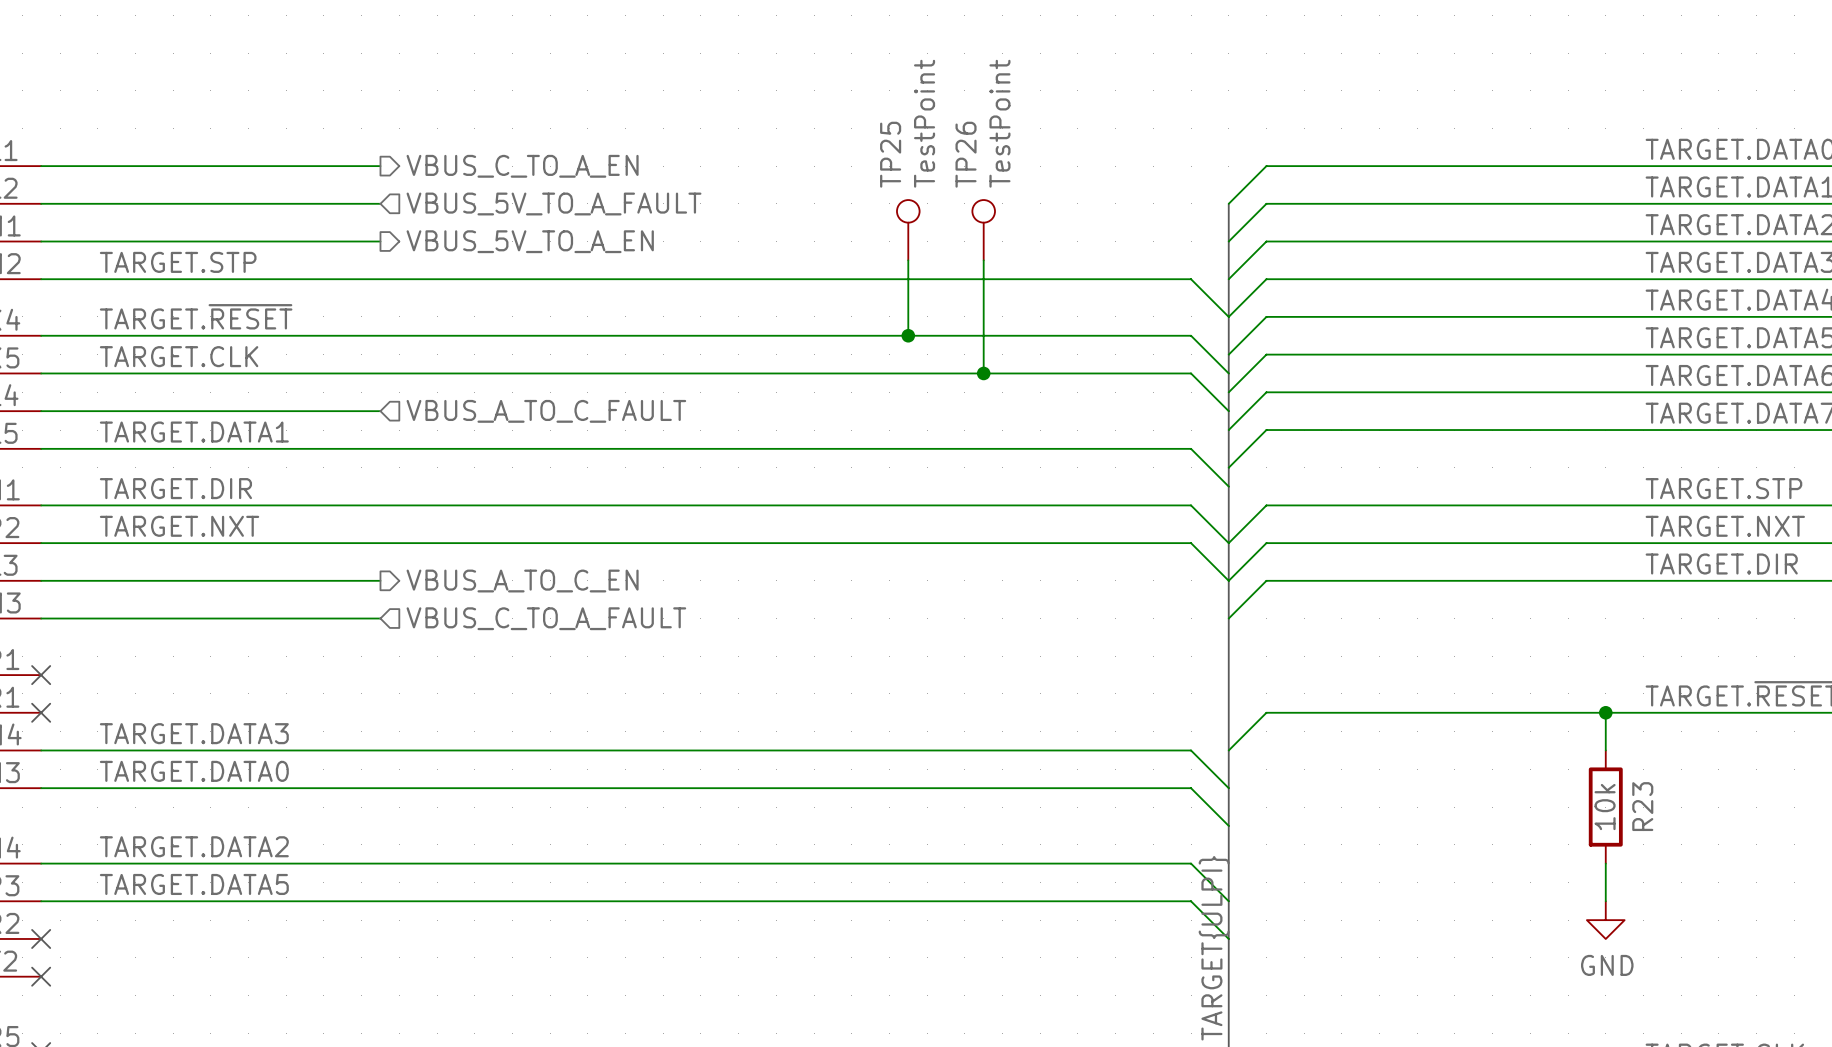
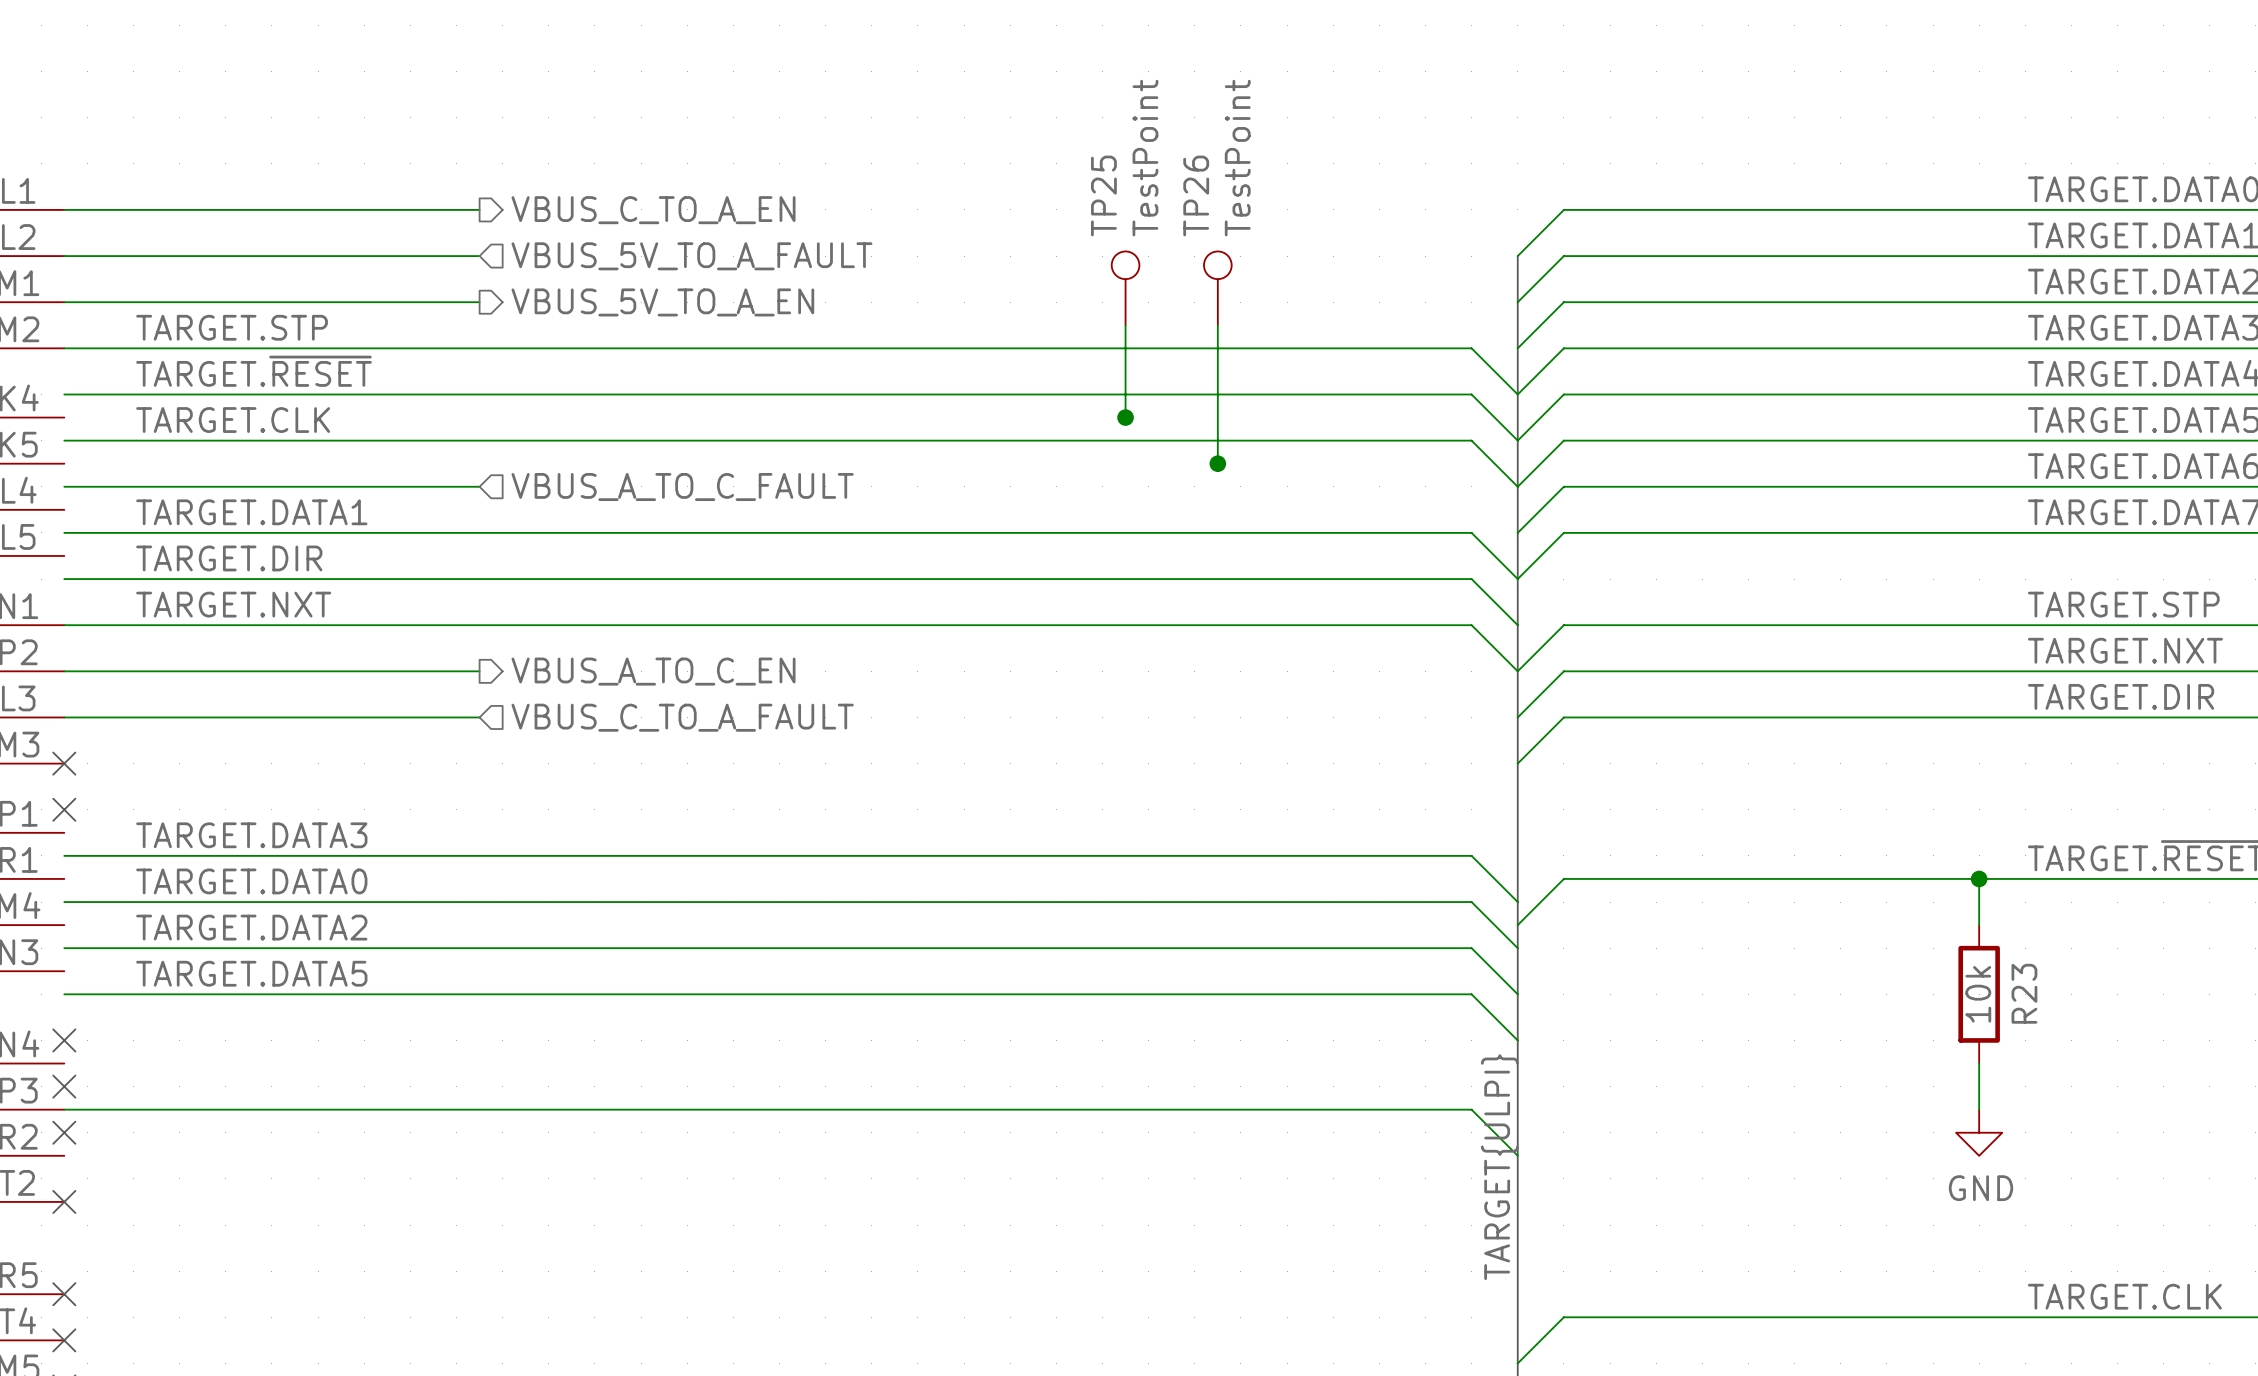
label position: TARGET.~{RESET} (196, 316) -> TARGET.~{RESET} (254, 371)
wire: (41, 335) (1191, 335) (1228, 373) -> (64, 394) (1471, 394) (1517, 440)
label position: TARGET.CLK (179, 356) -> TARGET.CLK (233, 420)
wire: (41, 373) (1191, 373) (1228, 411) -> (64, 440) (1471, 440) (1517, 486)
wire: (41, 411) (380, 411) -> (64, 486) (479, 486)
hierarchical label position: VBUS_A_TO_C_FAULT (546, 411) -> VBUS_A_TO_C_FAULT (682, 487)
label position: TARGET.DATA1 (194, 432) -> TARGET.DATA1 (251, 512)
wire: (41, 448) (1191, 448) (1228, 486) -> (64, 532) (1471, 532) (1517, 579)
label: none -> TARGET.DIR (229, 558)
wire: none -> (64, 579) (1471, 579) (1517, 625)
label: TARGET.DIR (175, 488) -> TARGET.NXT (233, 604)
label: TARGET.NXT (179, 526) -> none
wire: (380, 543) (1191, 543) (1228, 580) -> none
hierarchical label: none -> VBUS_A_TO_C_EN (653, 671)
hierarchical label shape: output (522, 581) -> input (682, 717)
hierarchical label: VBUS_A_TO_C_EN (522, 581) -> VBUS_C_TO_A_FAULT (682, 717)
wire: (41, 618) (380, 618) -> none
no-connect mark: none -> (64, 763)
hierarchical label: VBUS_C_TO_A_FAULT (546, 618) -> none
no-connect mark position: (41, 675) -> (64, 809)
wire: none -> (64, 855) (1471, 855) (1517, 902)
no-connect mark: (41, 712) -> none
label position: TARGET.DATA3 (194, 733) -> TARGET.DATA3 (251, 835)
wire: (41, 750) (1191, 750) (1228, 788) -> (64, 902) (1471, 902) (1517, 948)
label position: TARGET.DATA0 (194, 771) -> TARGET.DATA0 (251, 881)
wire: (41, 788) (1191, 788) (1228, 825) -> (64, 948) (1471, 948) (1517, 994)
no-connect mark: none -> (64, 1040)
label position: TARGET.DATA2 (194, 846) -> TARGET.DATA2 (251, 927)
wire: (41, 863) (1191, 863) (1228, 901) -> (64, 994) (1471, 994) (1517, 1040)
no-connect mark: none -> (64, 1086)
label position: TARGET.DATA5 (194, 884) -> TARGET.DATA5 (251, 973)
no-connect mark position: (41, 938) -> (64, 1132)

